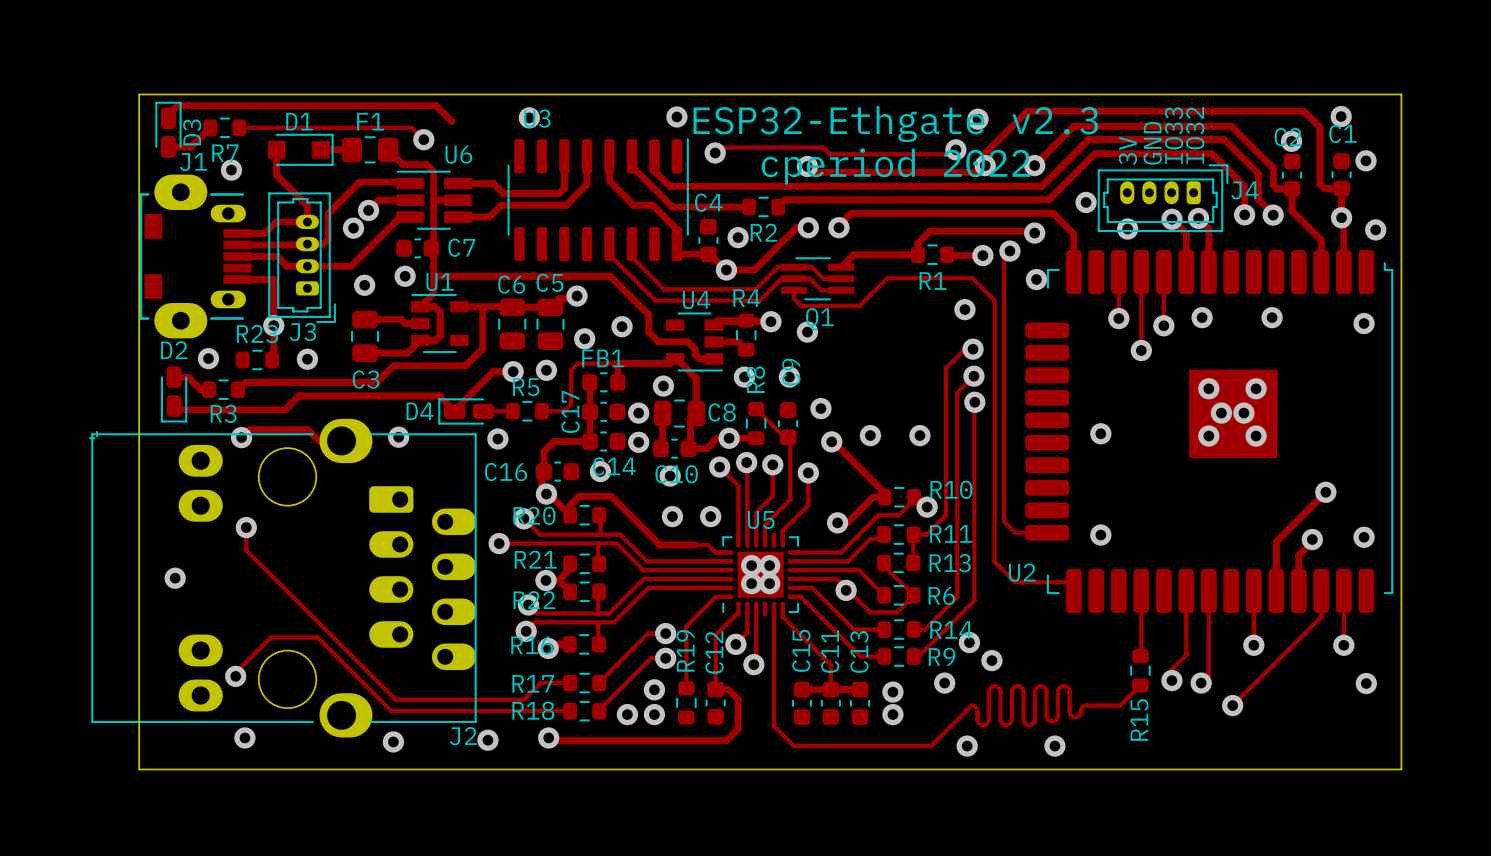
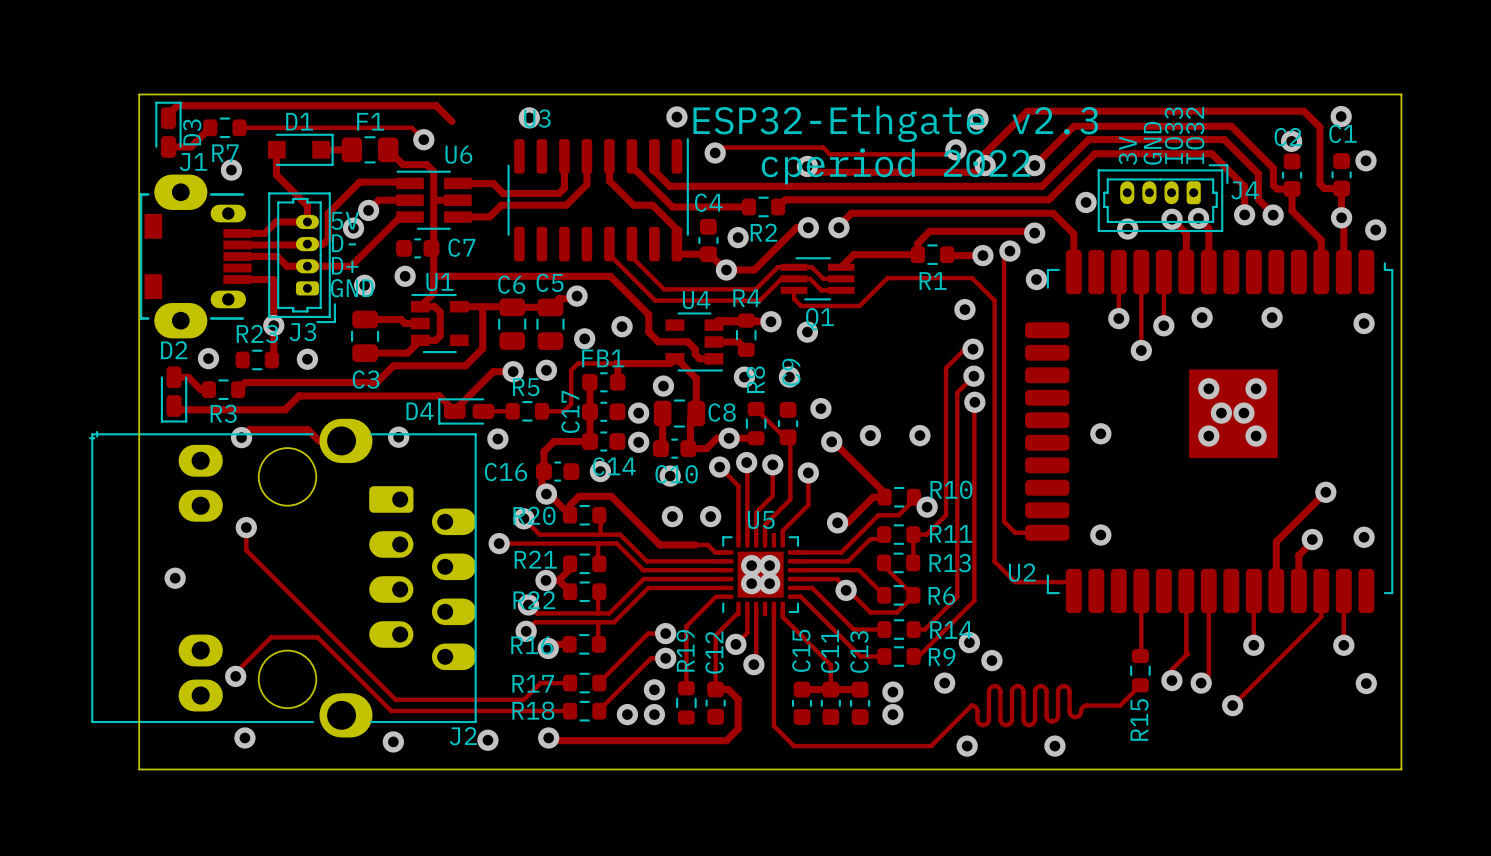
text: none -> 5V (345, 220)
text: none -> D- (344, 243)
text: none -> D+ (345, 265)
text: none -> GND (352, 288)

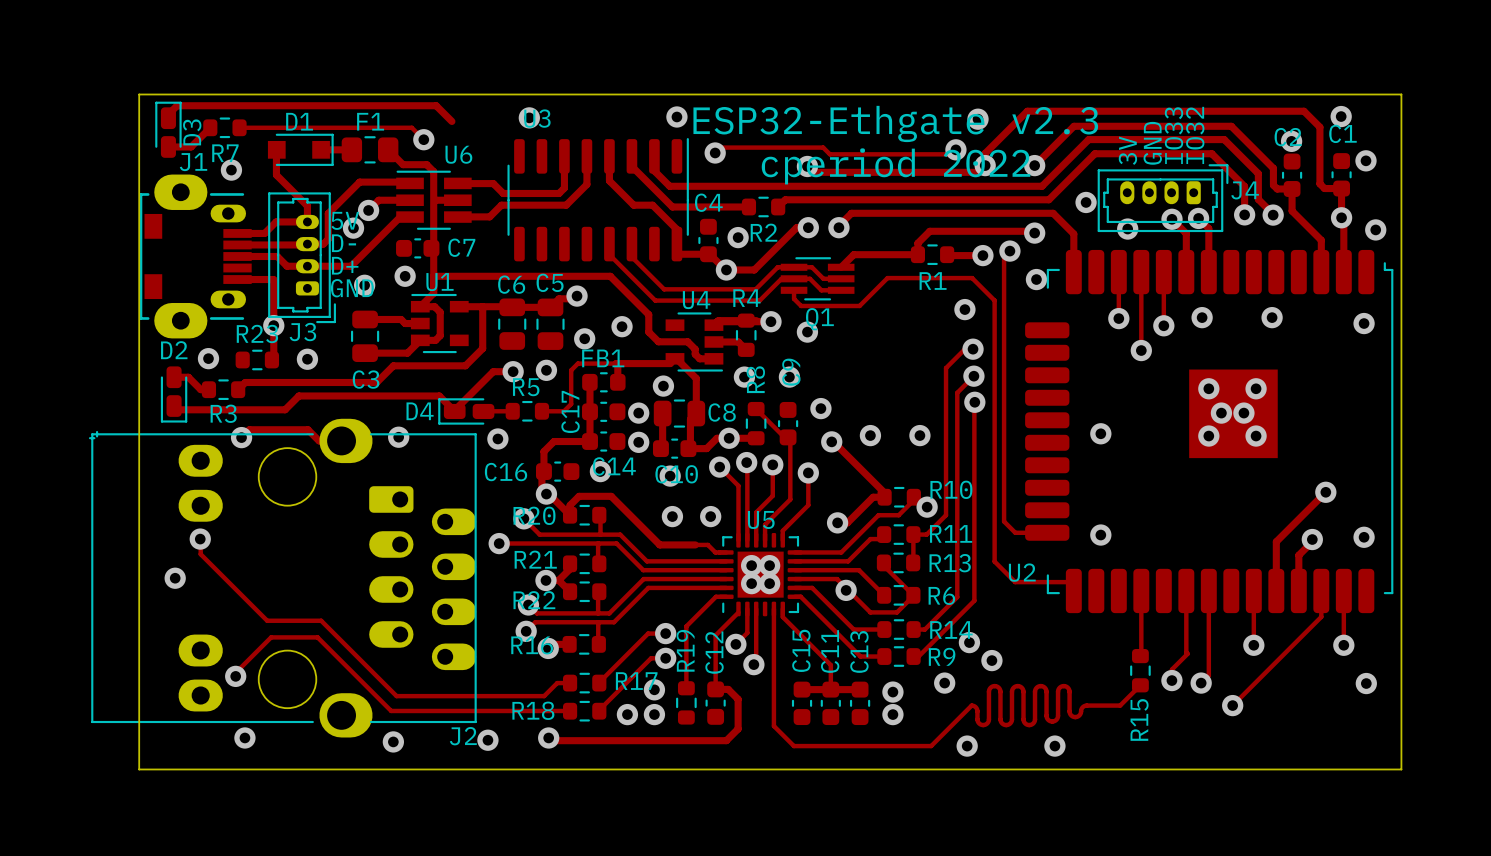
track: (246, 527) (246, 550) (395, 699) (523, 699) (540, 683) (557, 683) -> (200, 539) (200, 554) (267, 620) (321, 620) (396, 696) (544, 696) (557, 683)
via position: (246, 527) -> (200, 539)
R17 name position: R17 (533, 683) -> R17 (636, 681)

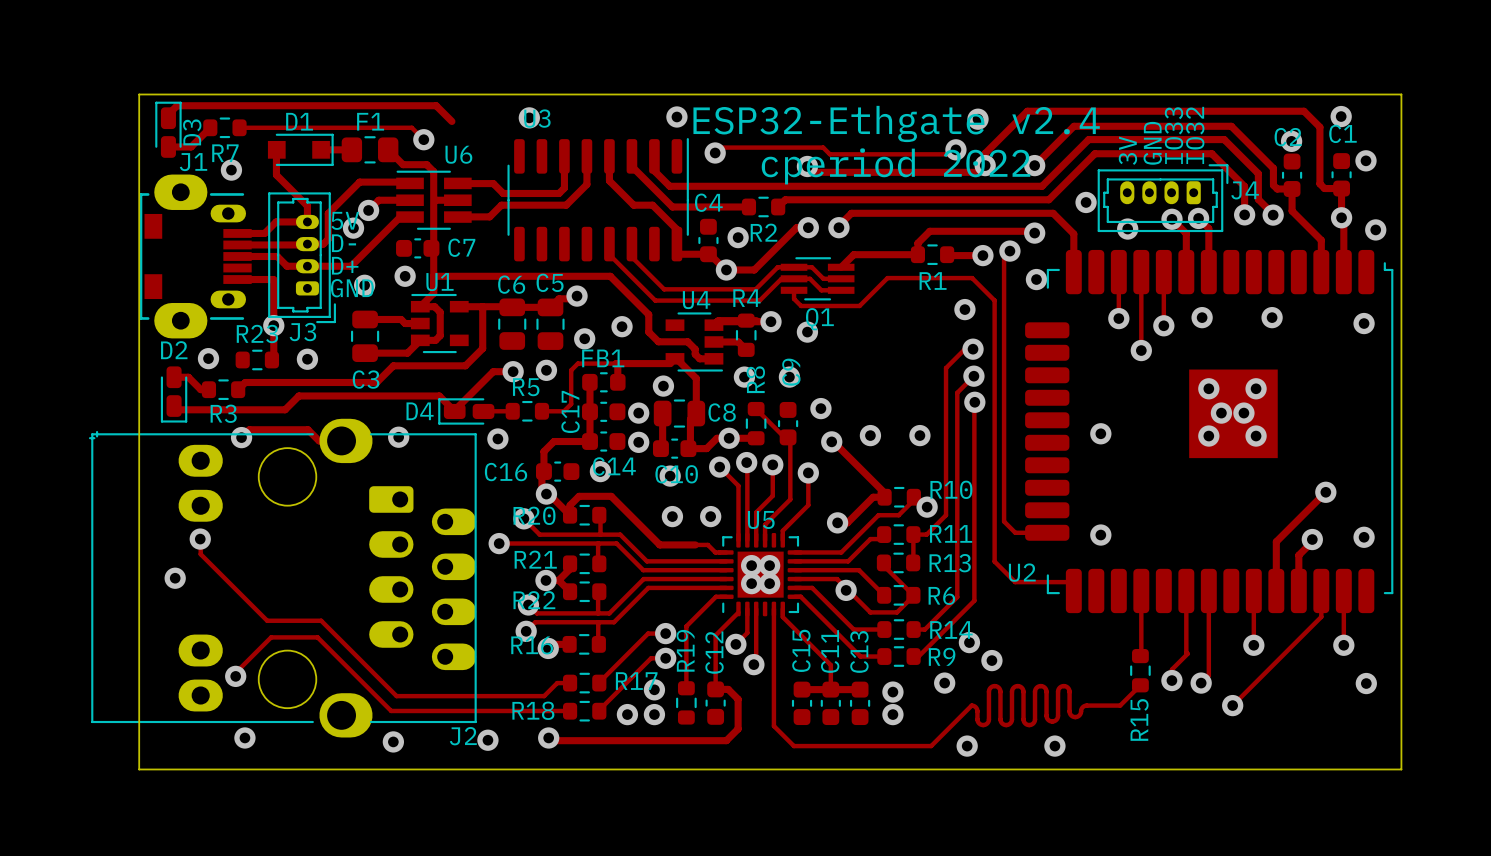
text: ESP32-Ethgate v2.3 (895, 123) -> ESP32-Ethgate v2.4 (896, 123)

